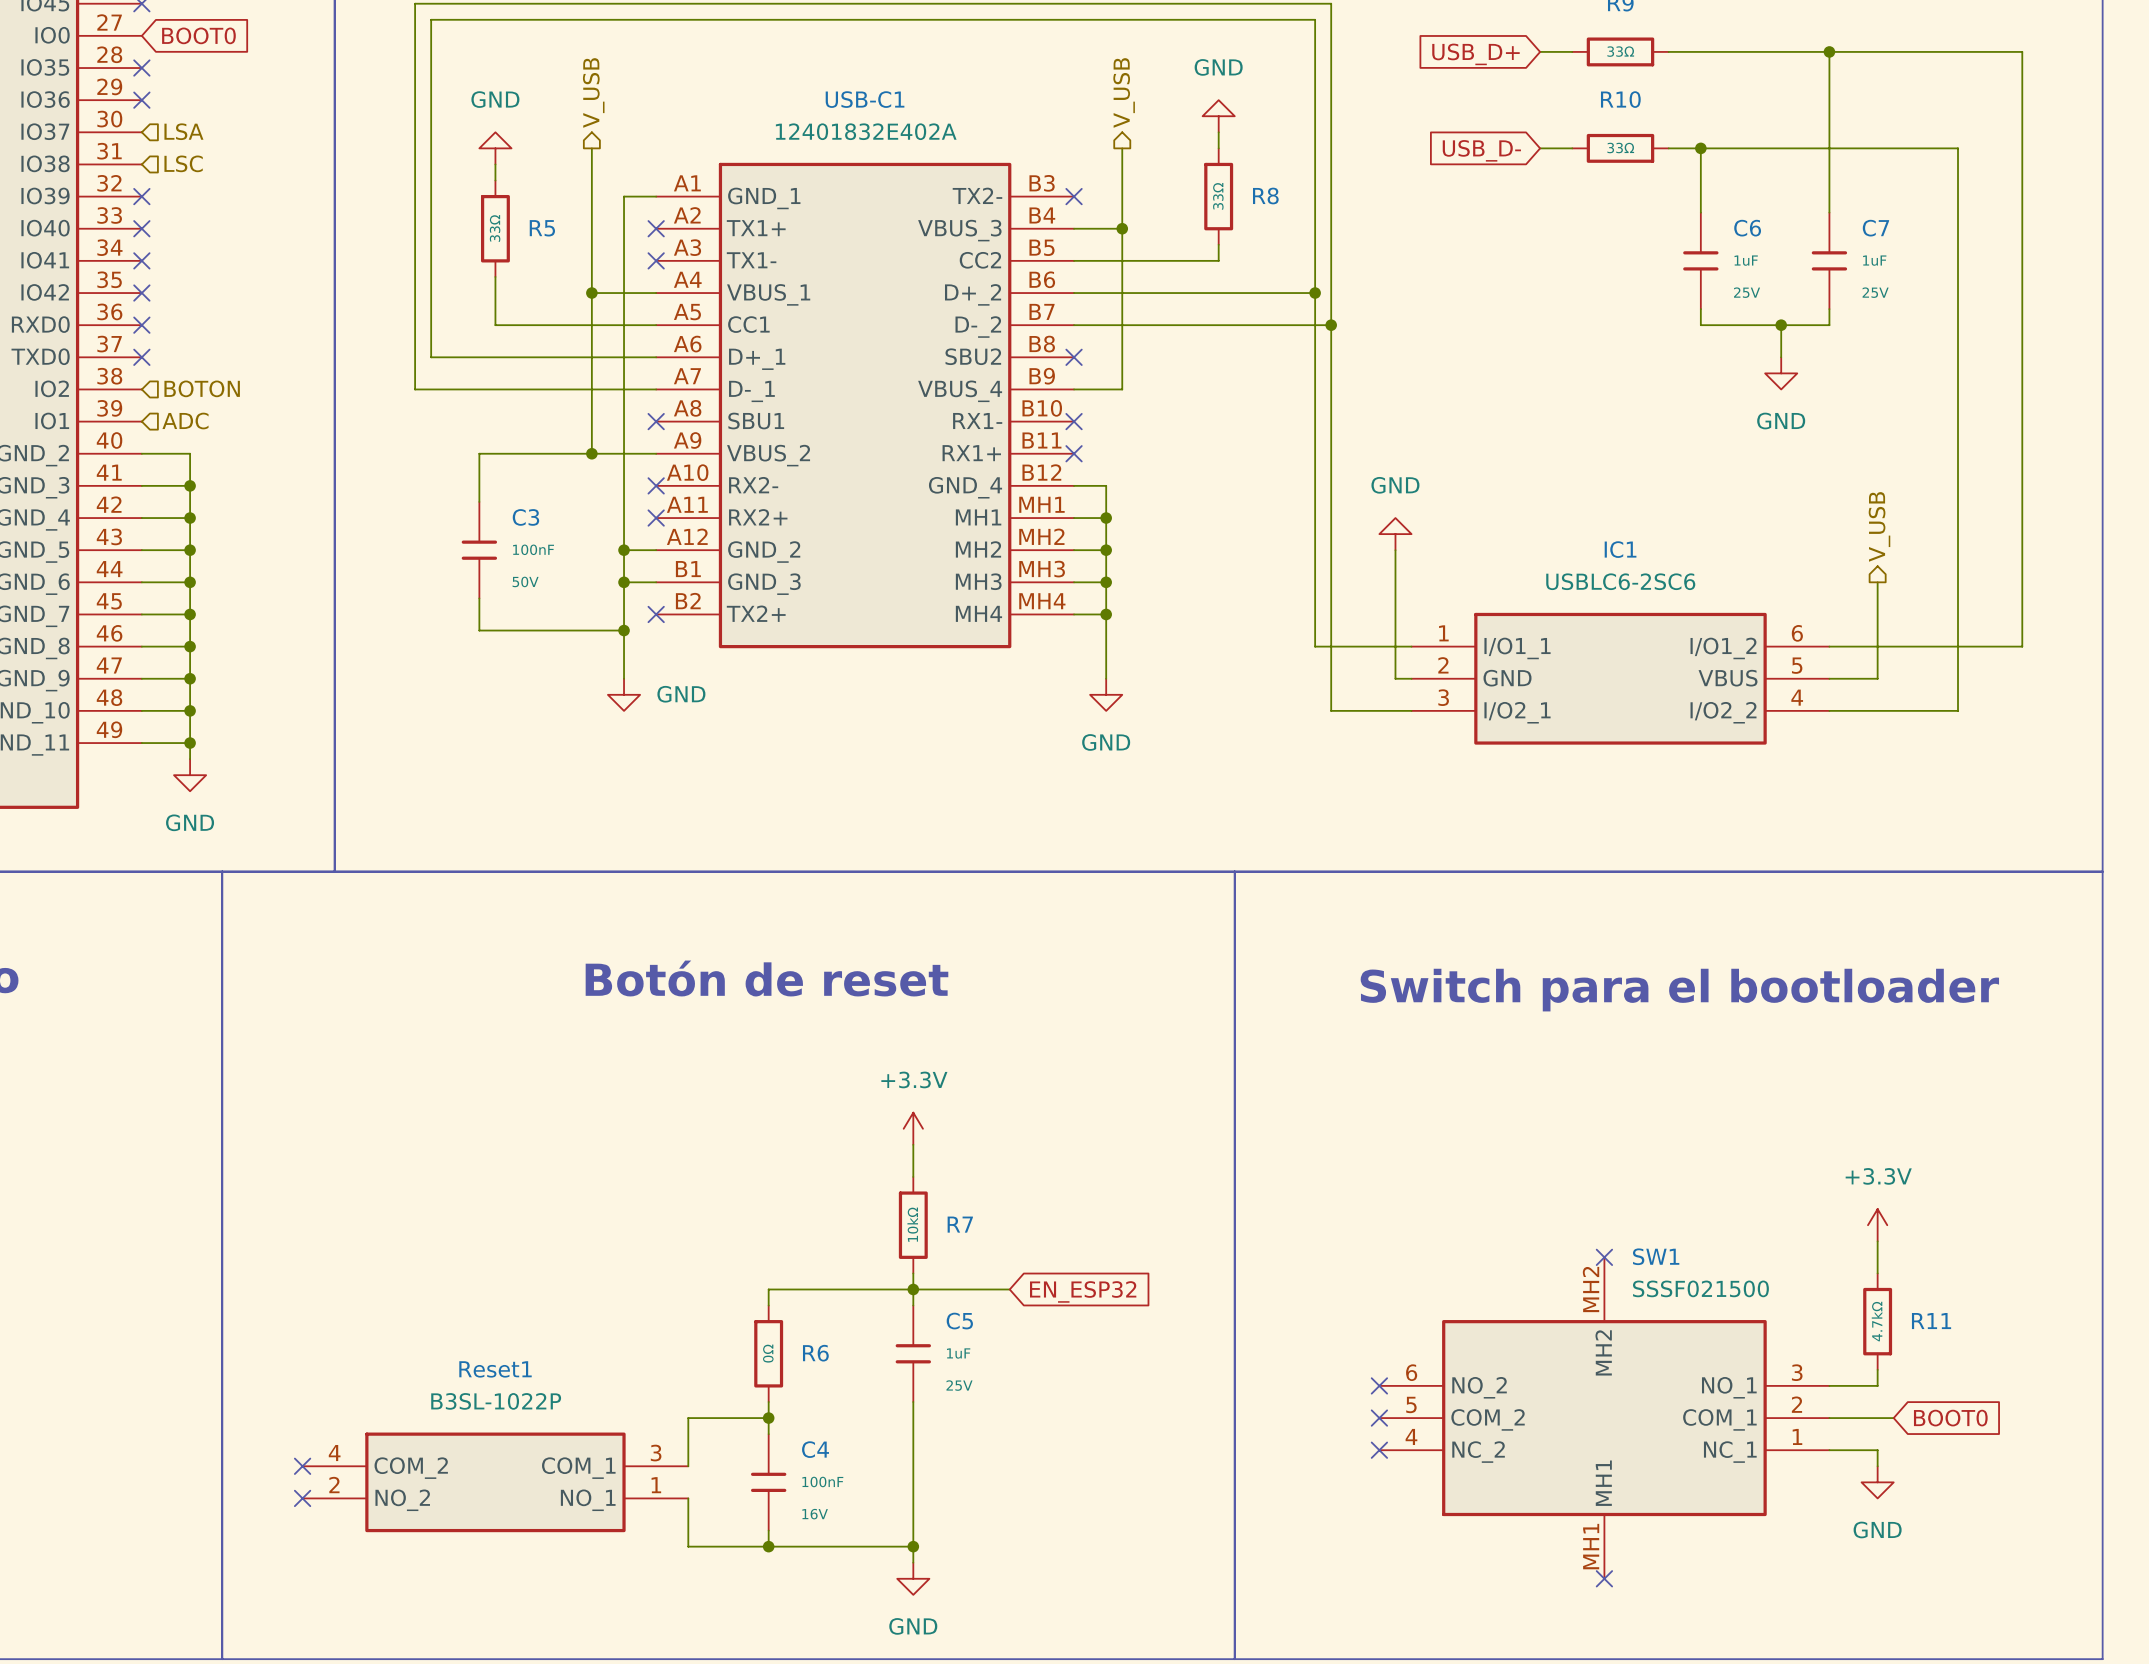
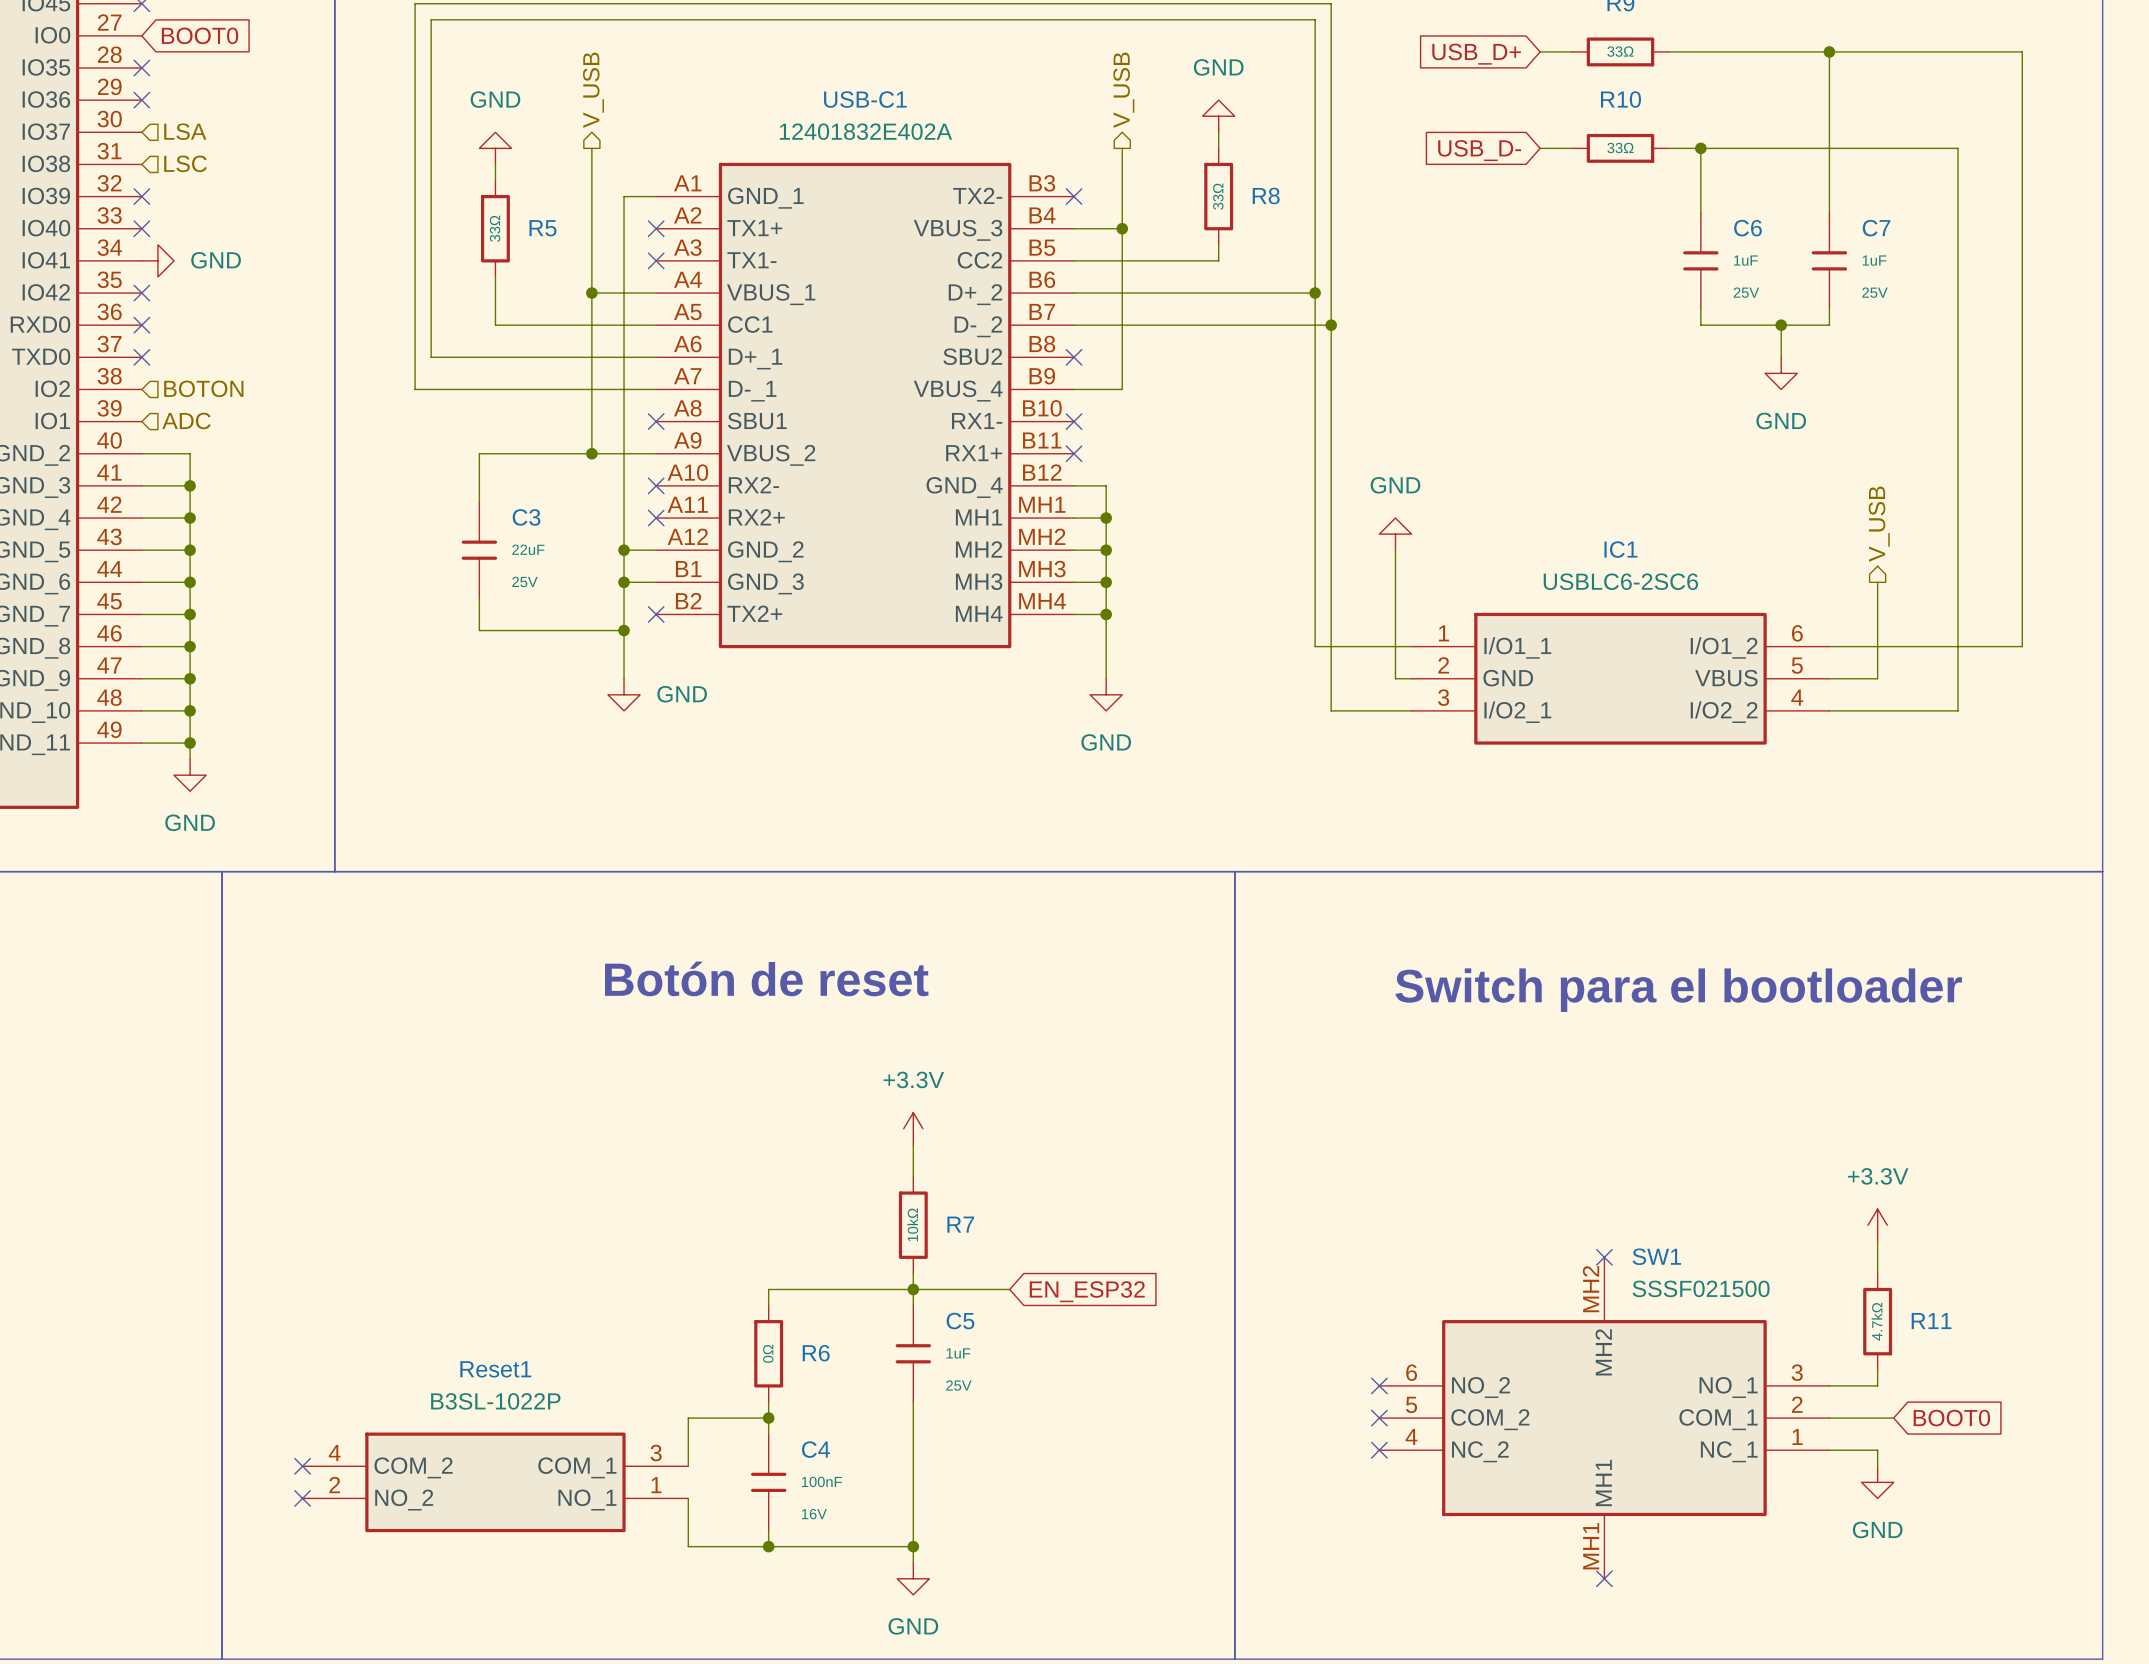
no-connect mark: (141, 260) -> none
power symbol: none -> GND (157, 260)
C3 value: 100nF (533, 549) -> 22uF (528, 549)
C3 text: 50V (525, 581) -> 25V (524, 581)

